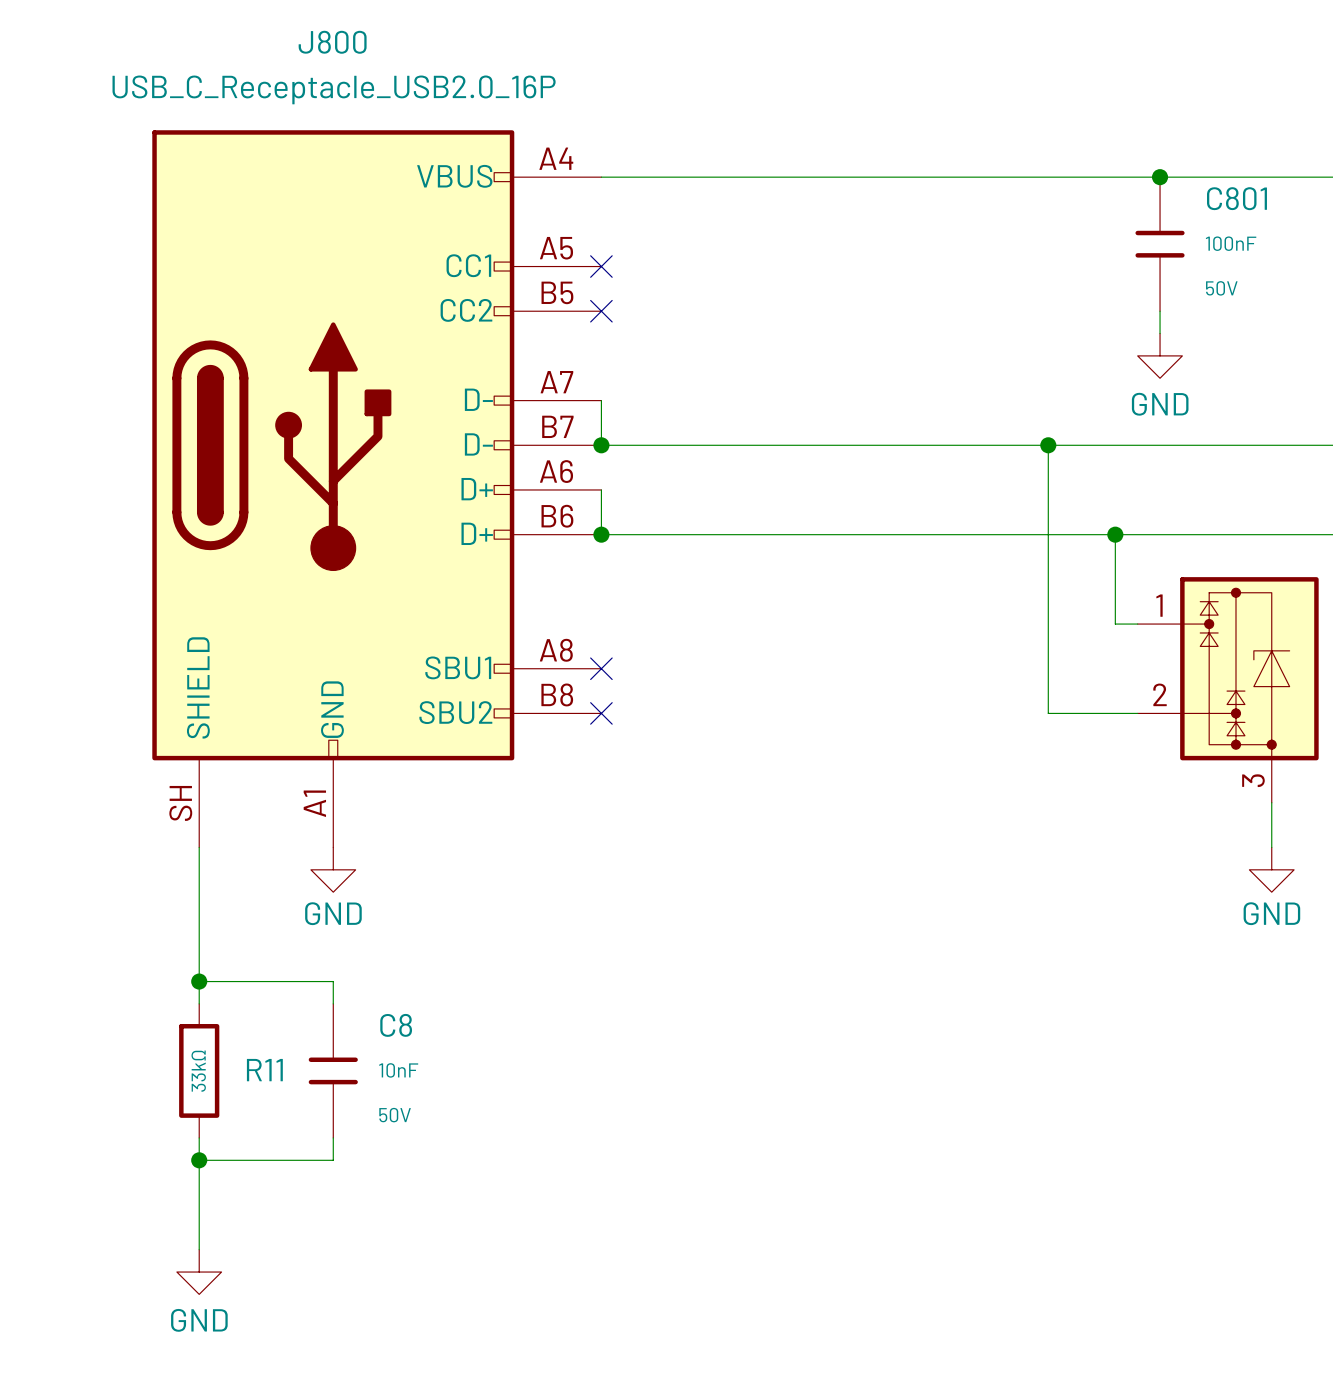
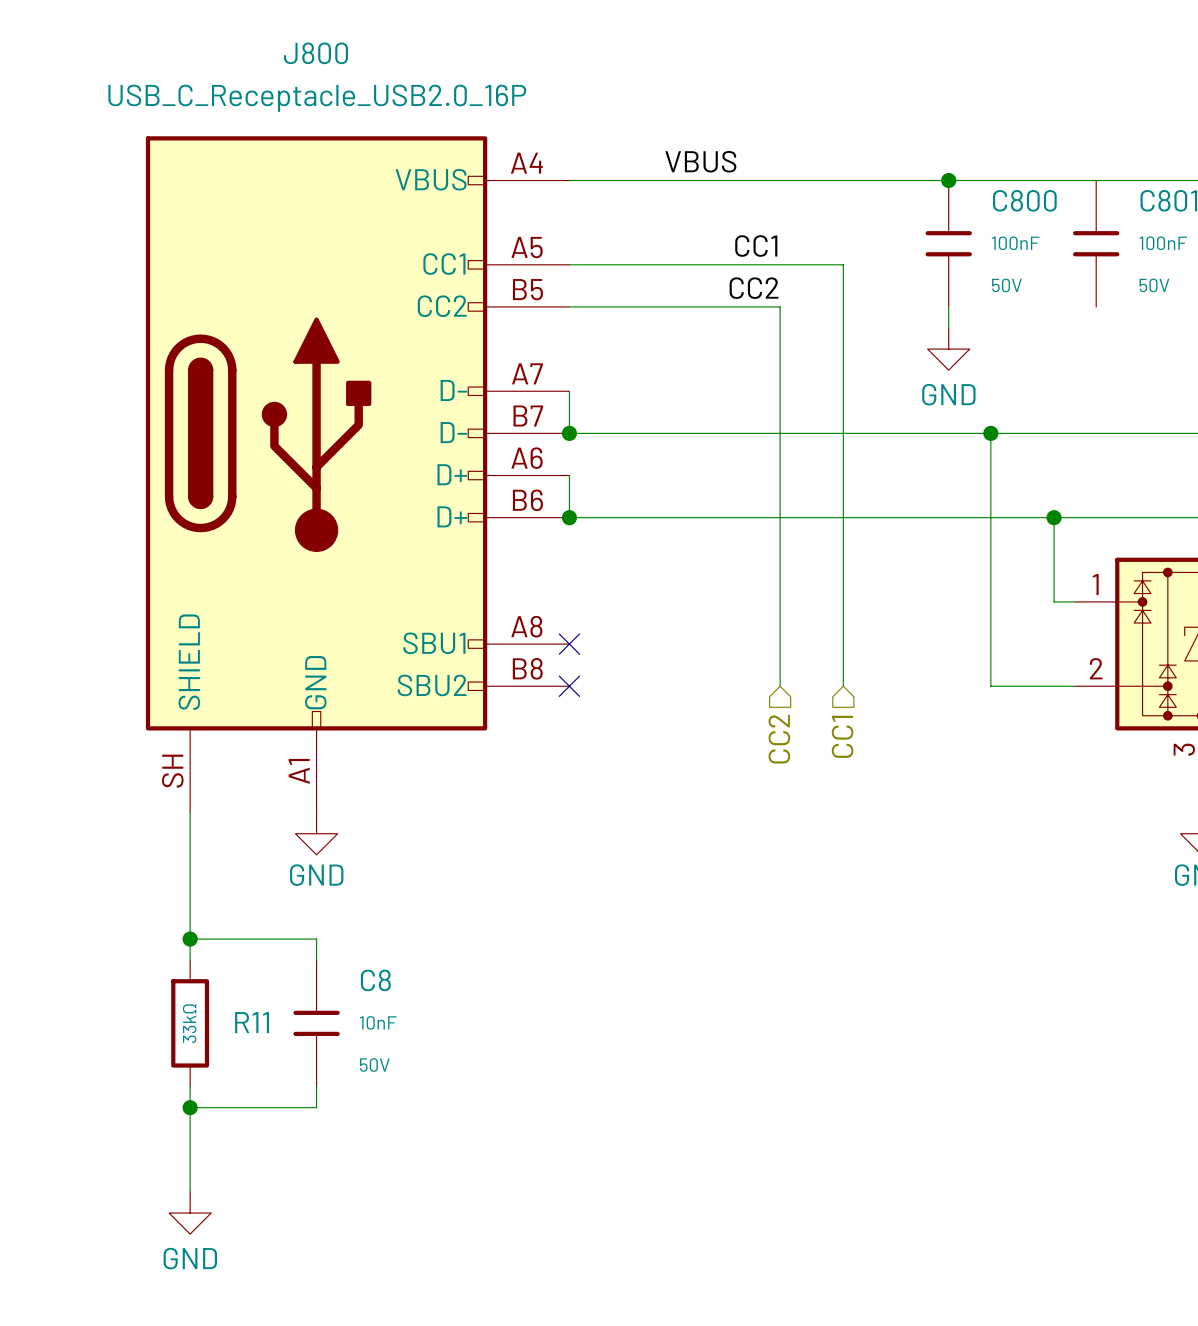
label: none -> VBUS (700, 161)
junction: none -> (948, 180)
junction: (1160, 177) -> none
C800: none -> 100nF (948, 243)
label: none -> CC1 (756, 246)
wire: none -> (569, 264) (843, 264) (843, 686)
no-connect mark: (601, 266) -> none
label: none -> CC2 (754, 288)
wire: none -> (569, 306) (780, 306) (780, 686)
no-connect mark: (601, 311) -> none
wire: (1160, 311) (1160, 333) -> (948, 306) (948, 328)
power symbol position: GND (1160, 355) -> GND (948, 349)
hierarchical label: none -> CC1 (842, 736)
hierarchical label: none -> CC2 (779, 739)

